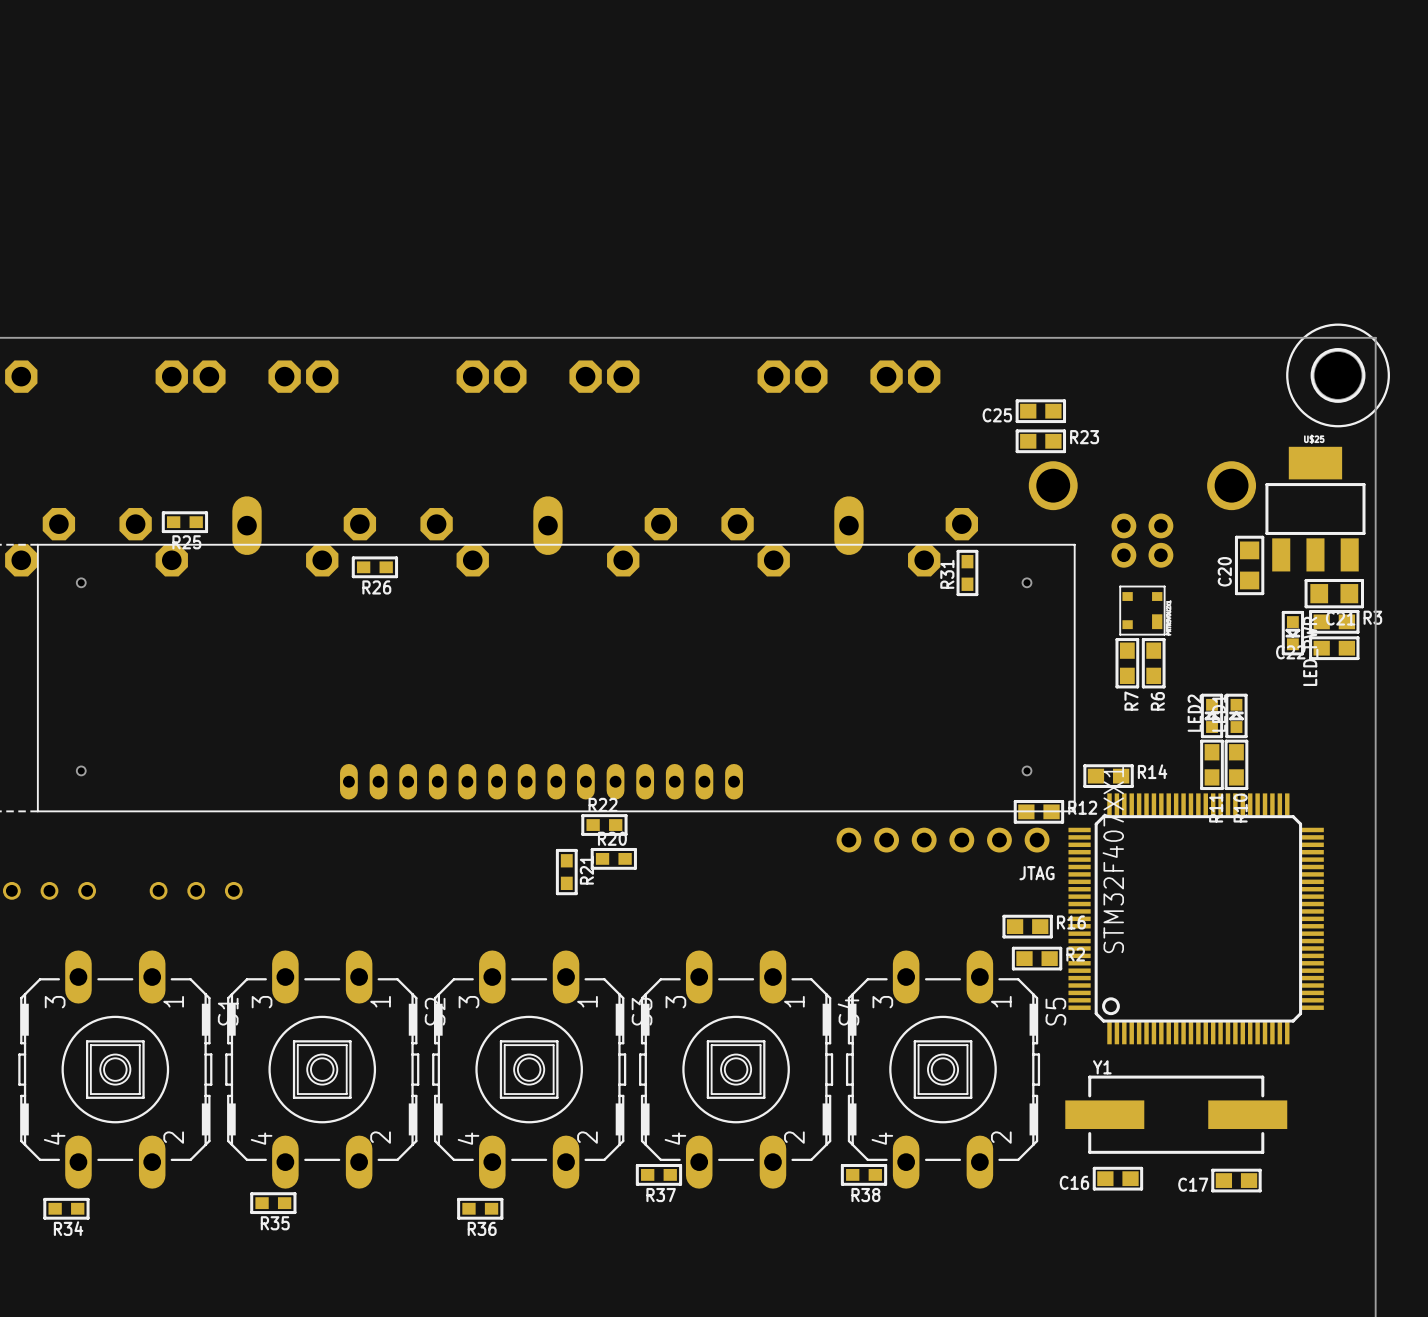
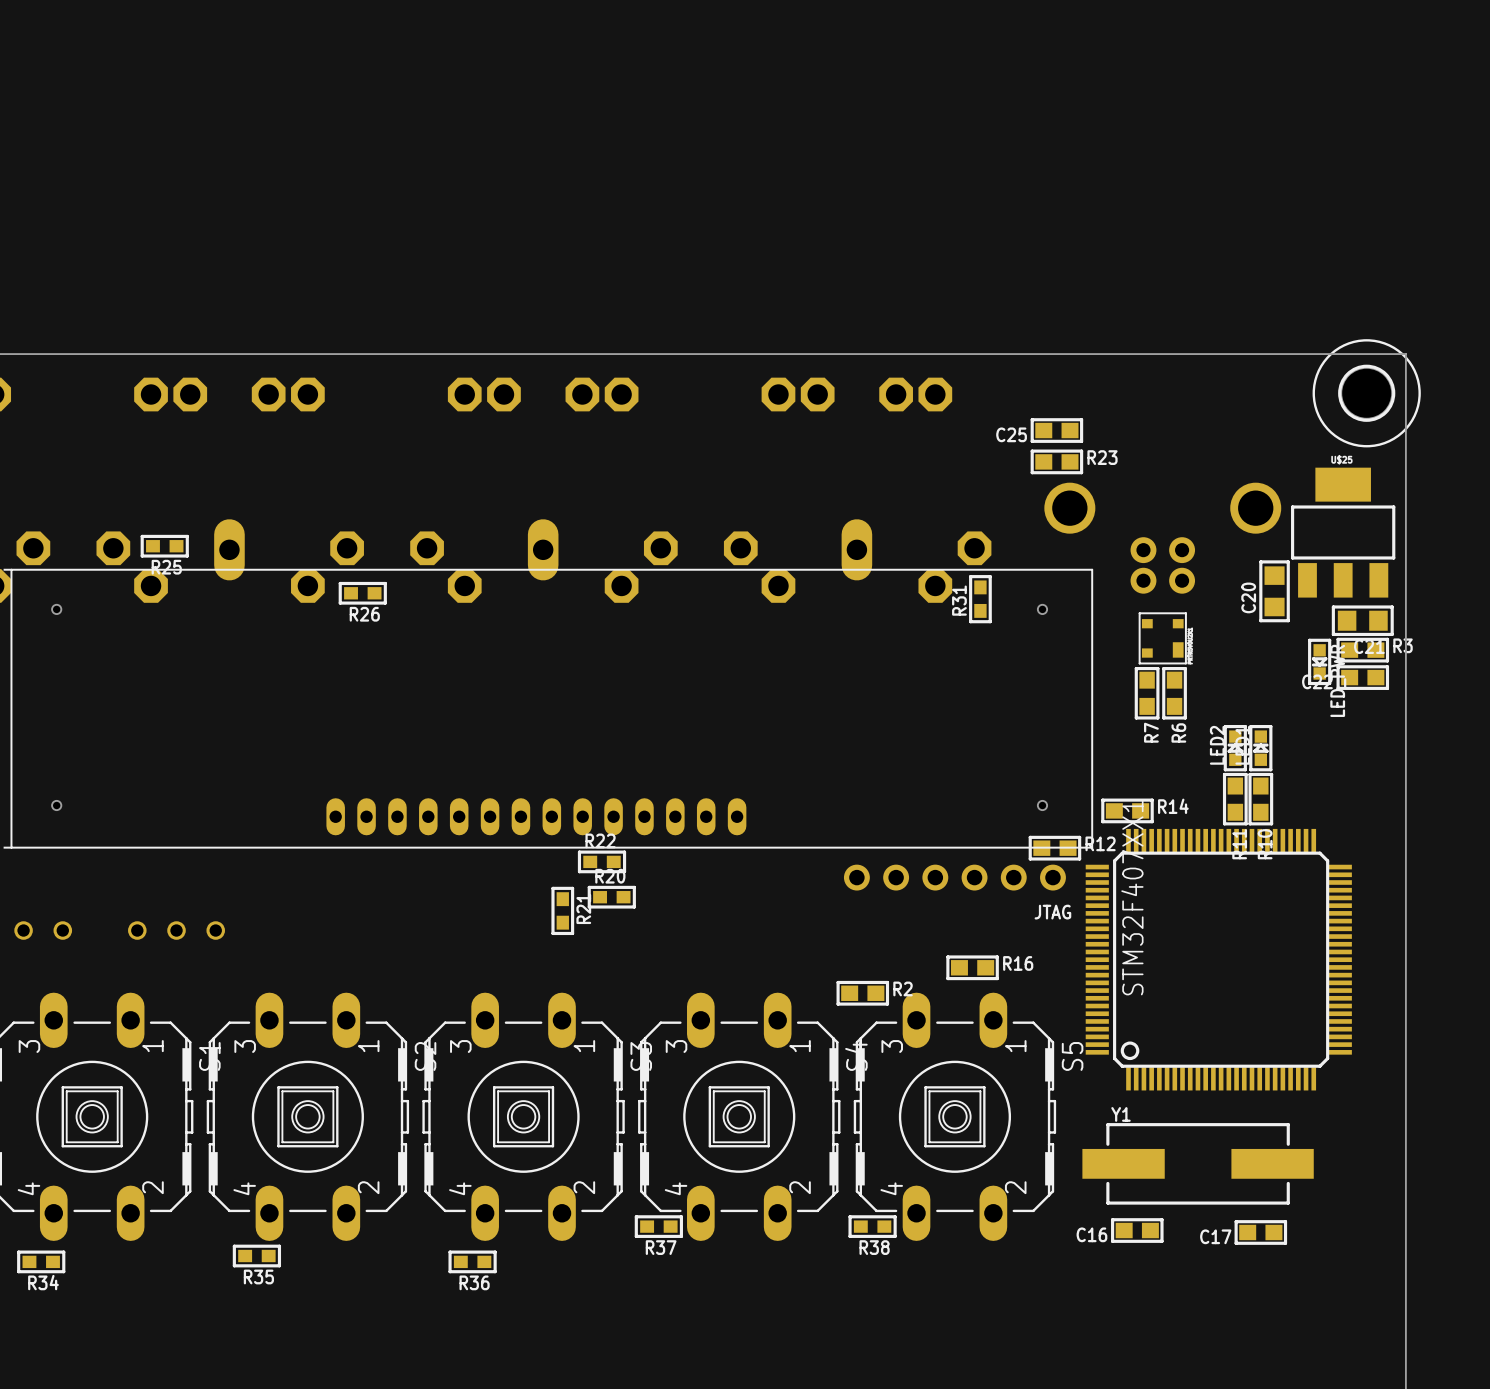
R16 position: (1027, 926) -> (972, 967)
R2 position: (1037, 958) -> (862, 993)

